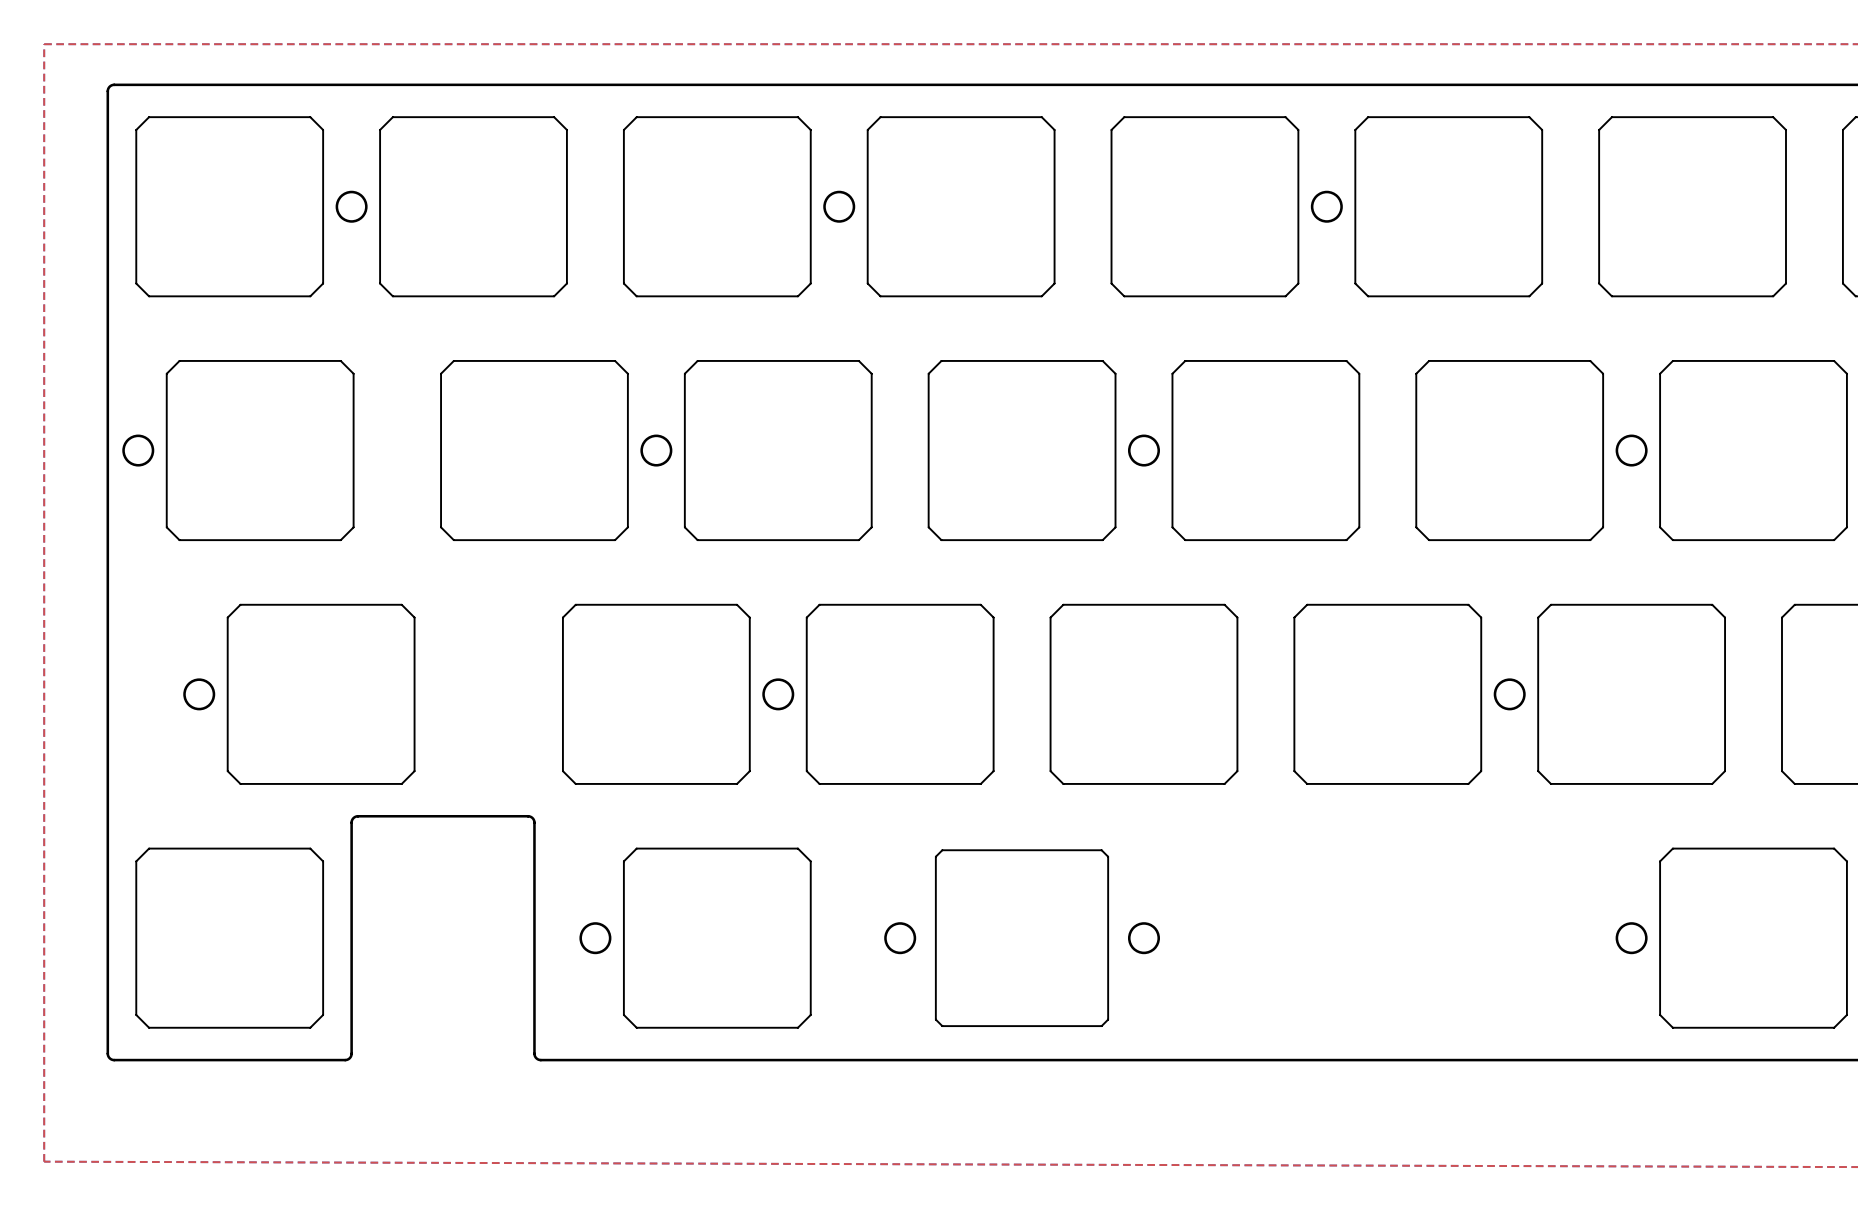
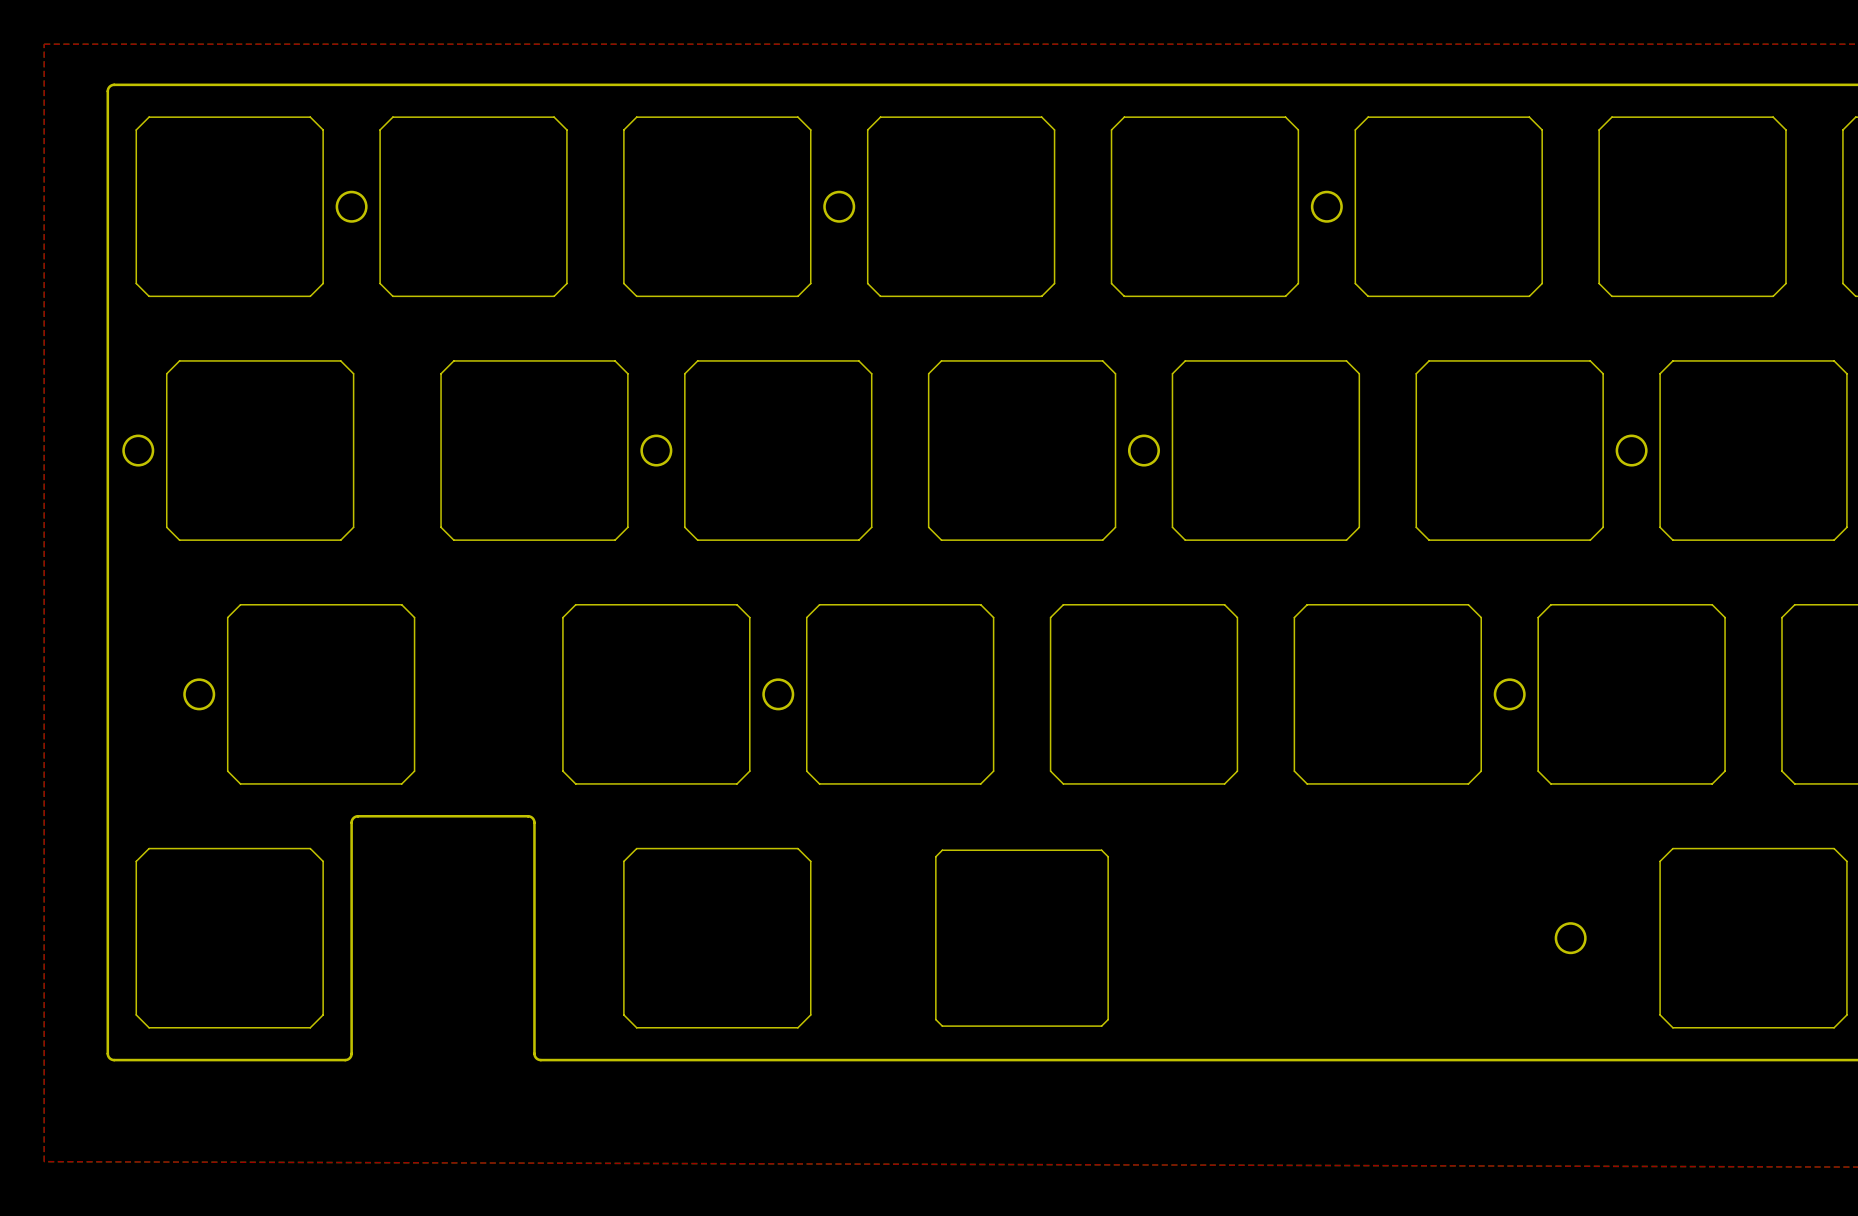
round board edge: [579, 922, 612, 955] -> none
round board edge: [884, 922, 917, 955] -> none
round board edge: [1127, 922, 1160, 955] -> none
round board edge position: (1631, 938) -> (1570, 938)

